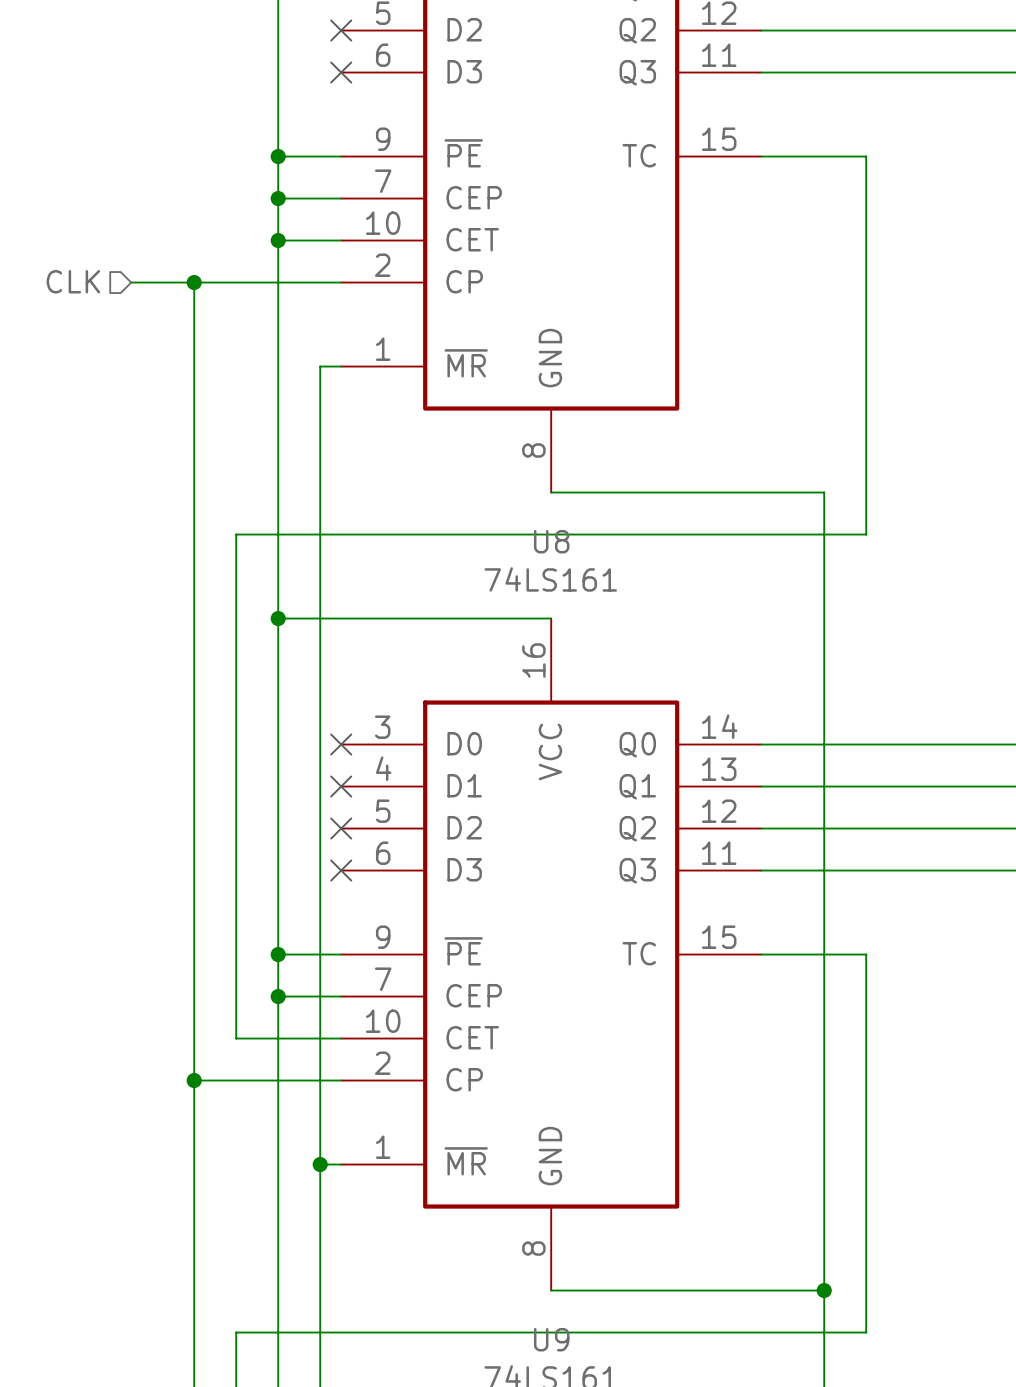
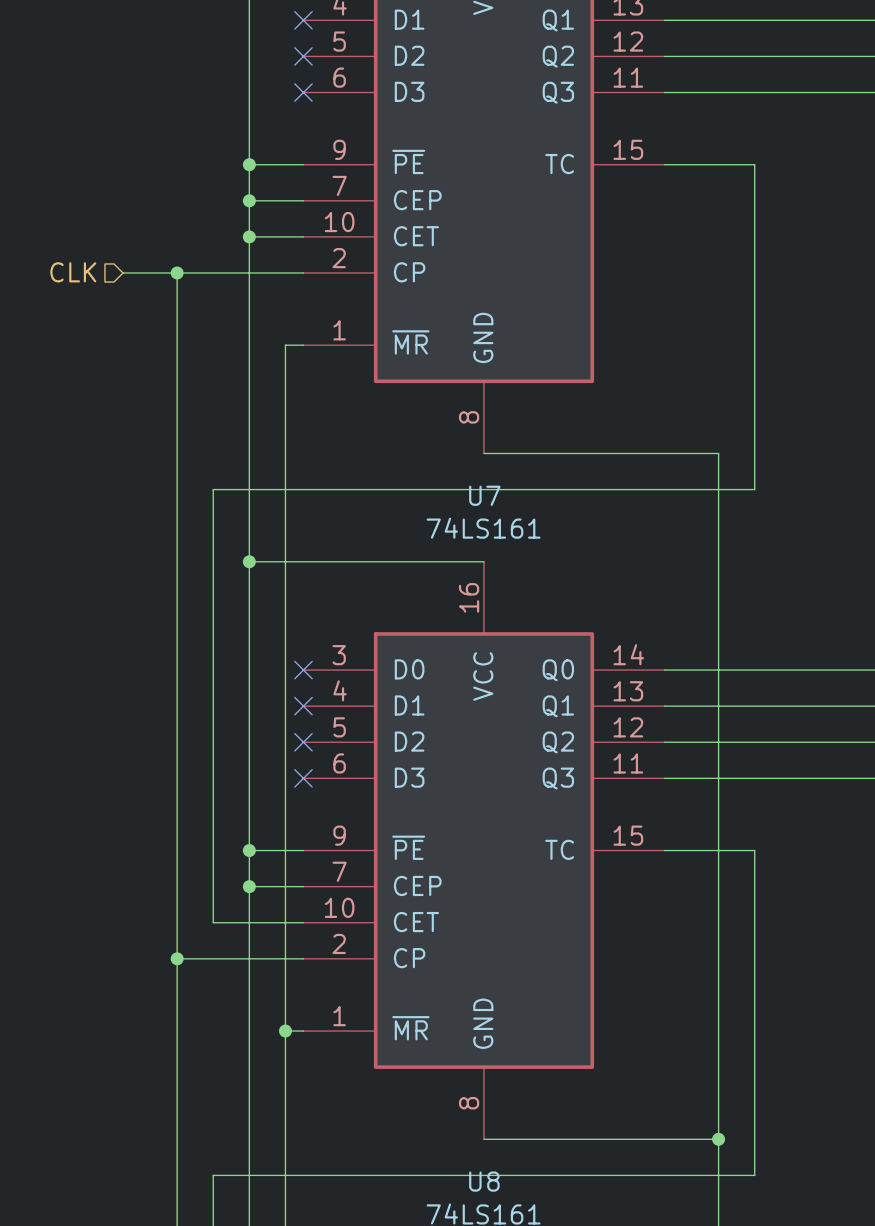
U8 name: U8 (551, 541) -> U7 (484, 495)
U9 name: U9 (551, 1339) -> U8 (484, 1181)

